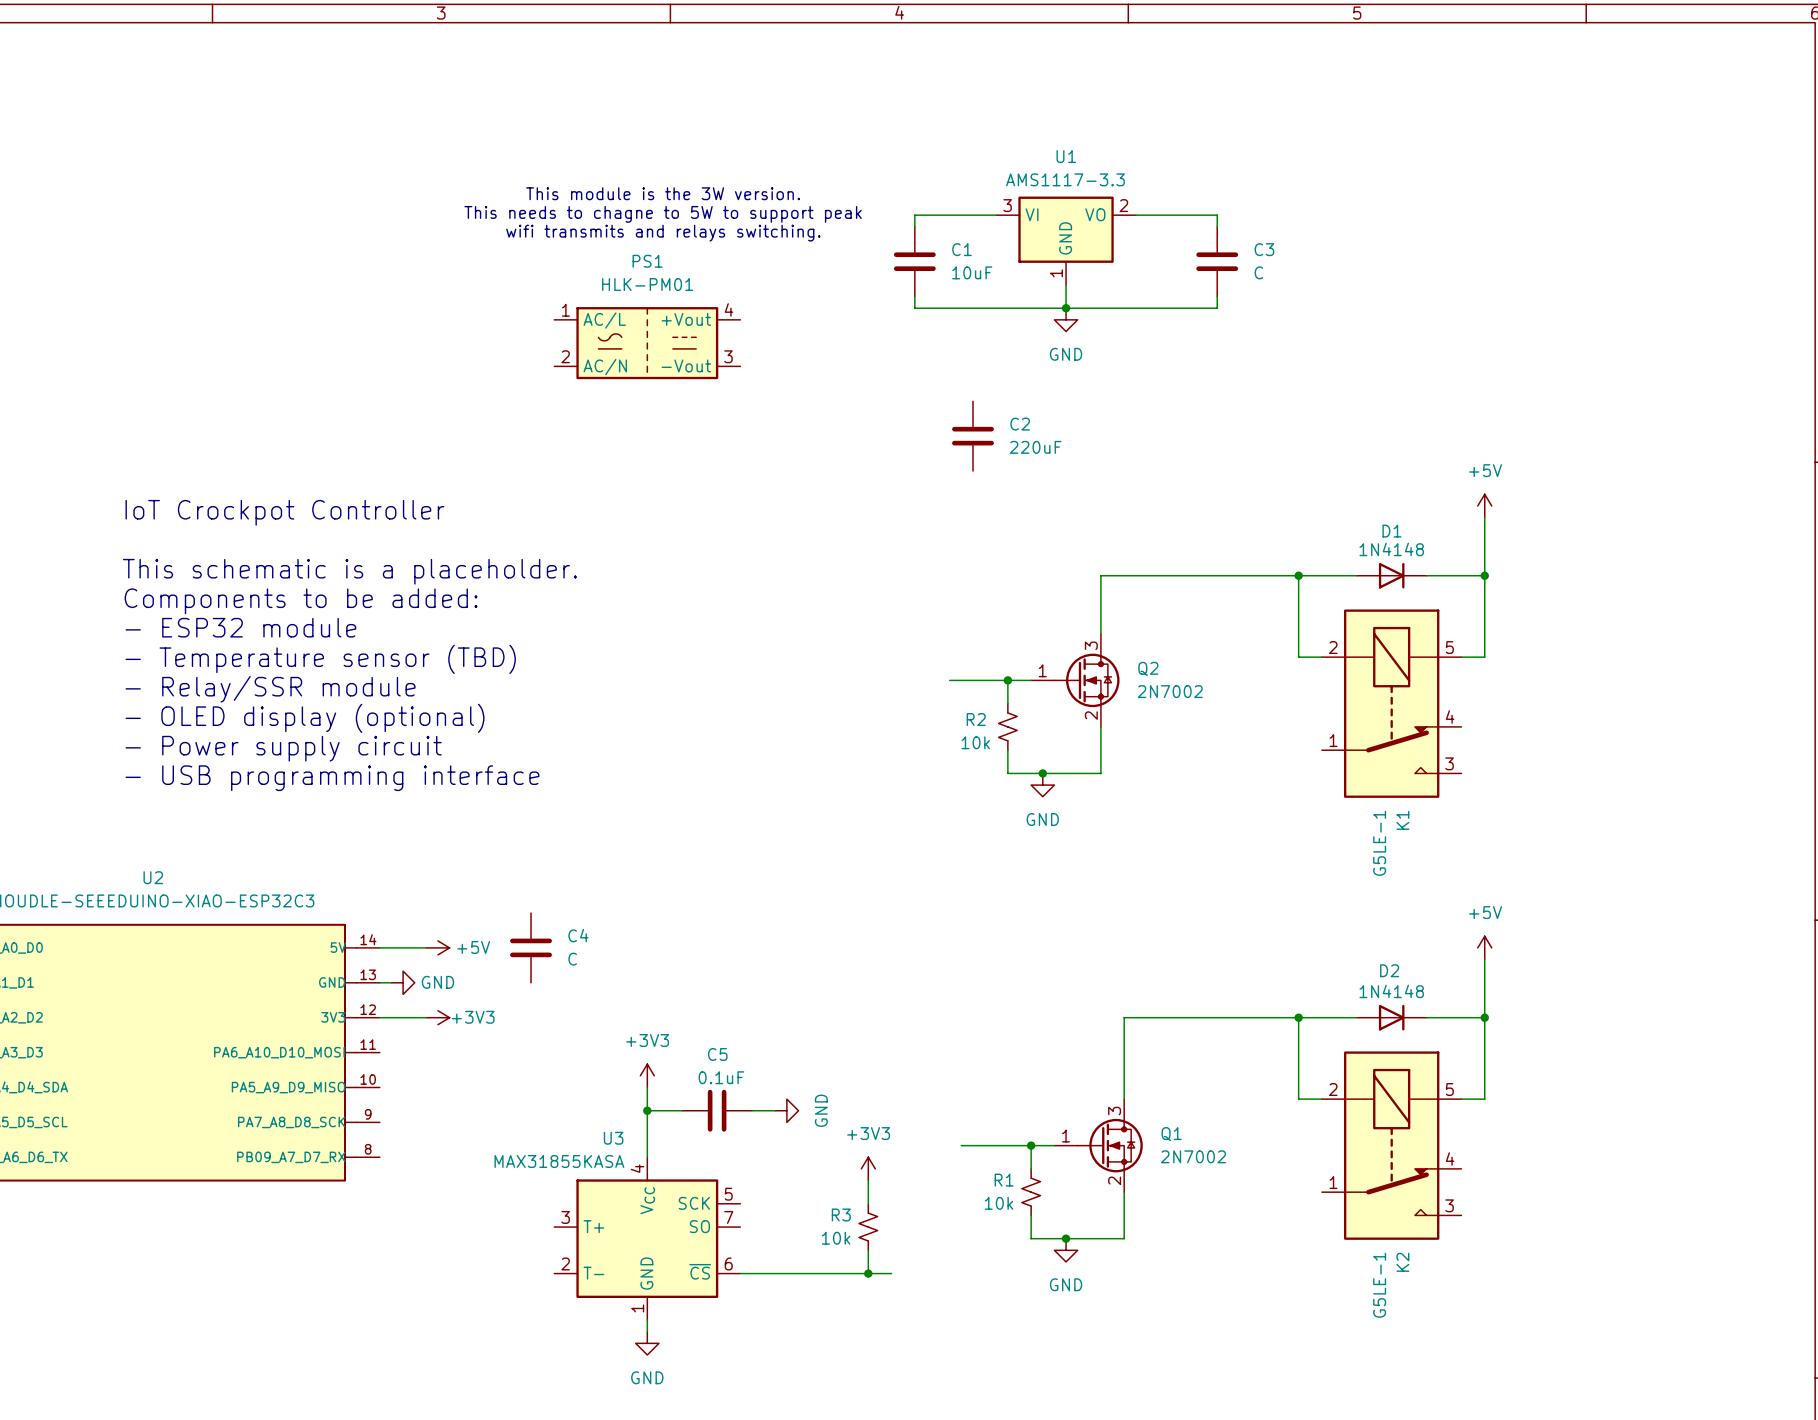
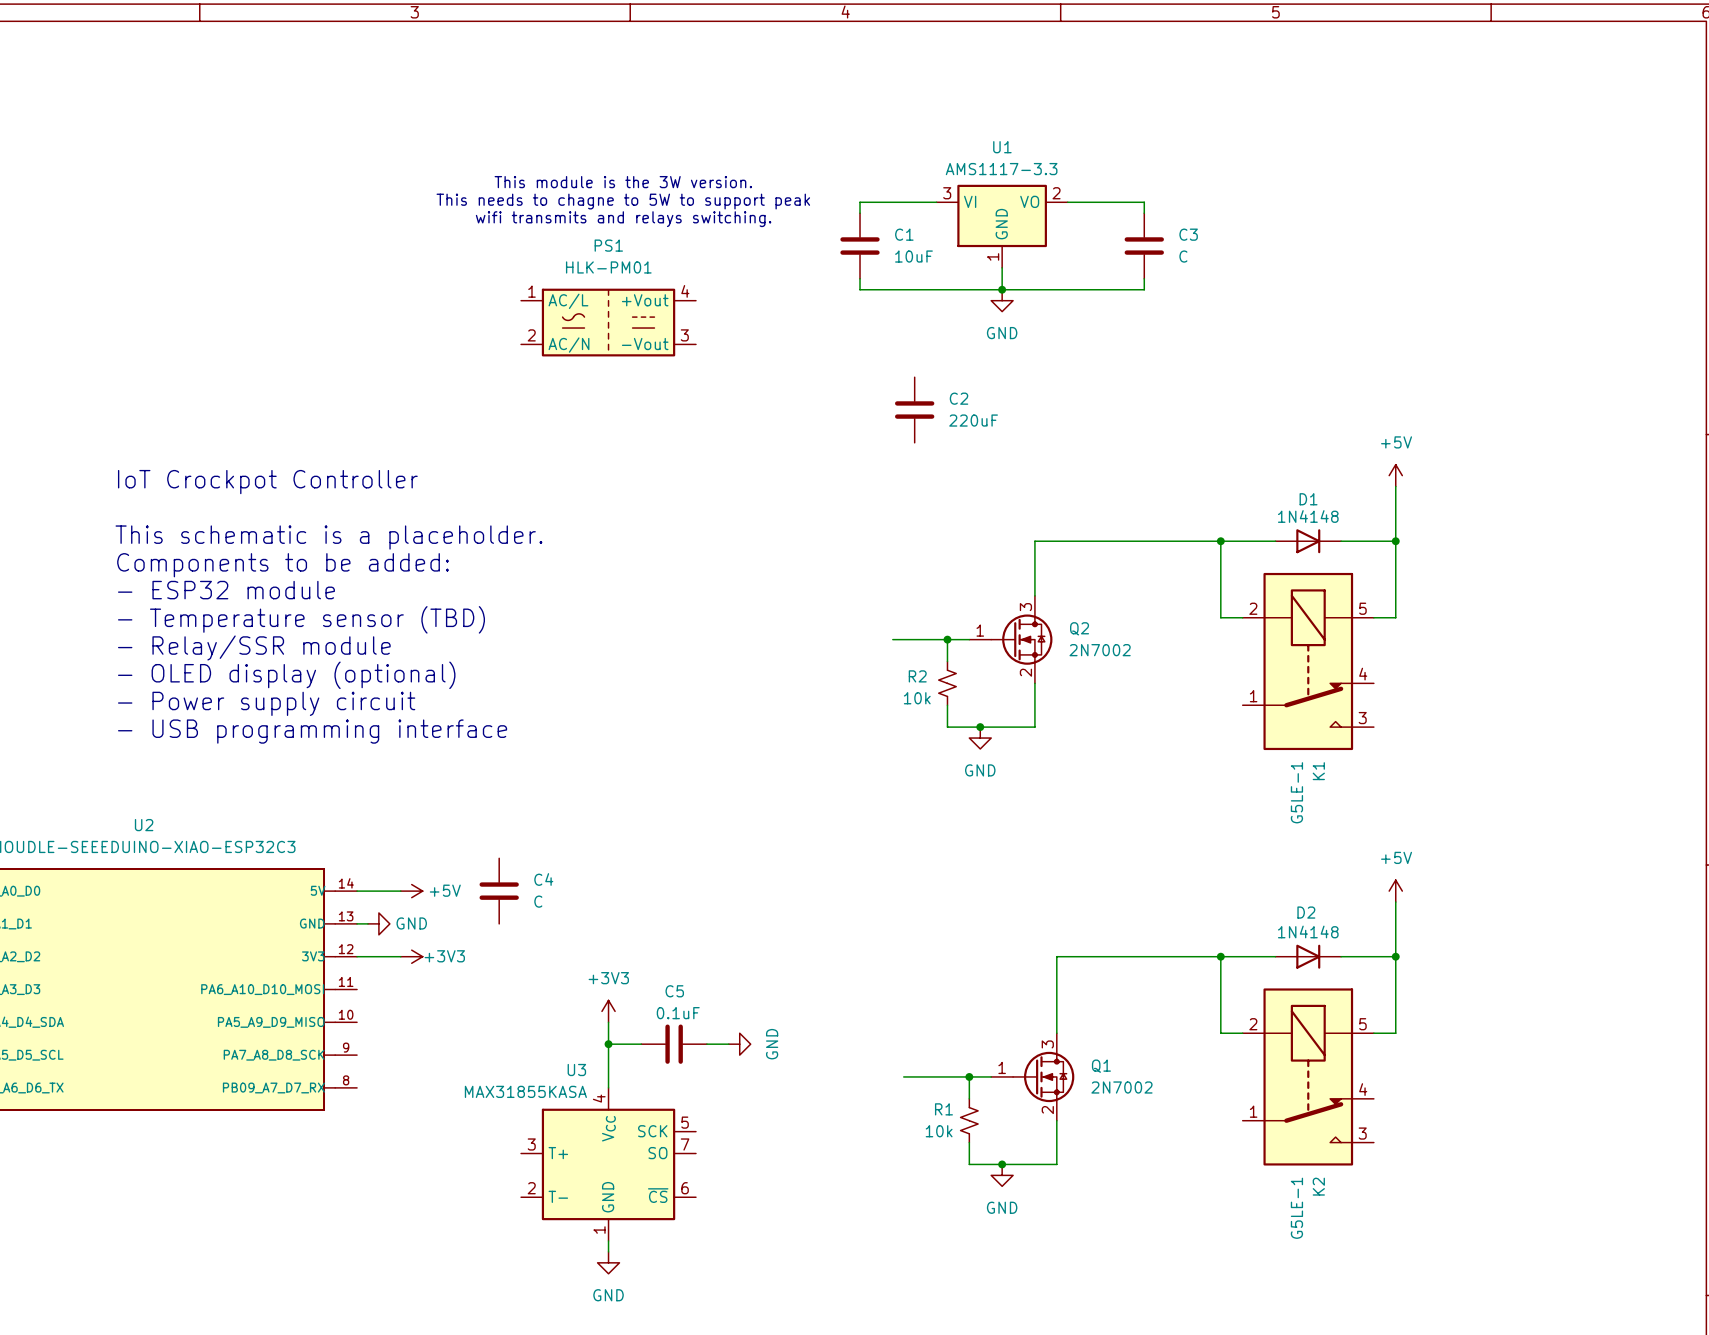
power symbol: +3V3 (868, 1168) -> none
wire: (868, 1180) (868, 1203) -> none
R3: 10k (868, 1227) -> none
wire: (868, 1250) (868, 1273) -> none
wire: (740, 1273) (891, 1273) -> none
junction: (868, 1273) -> none

